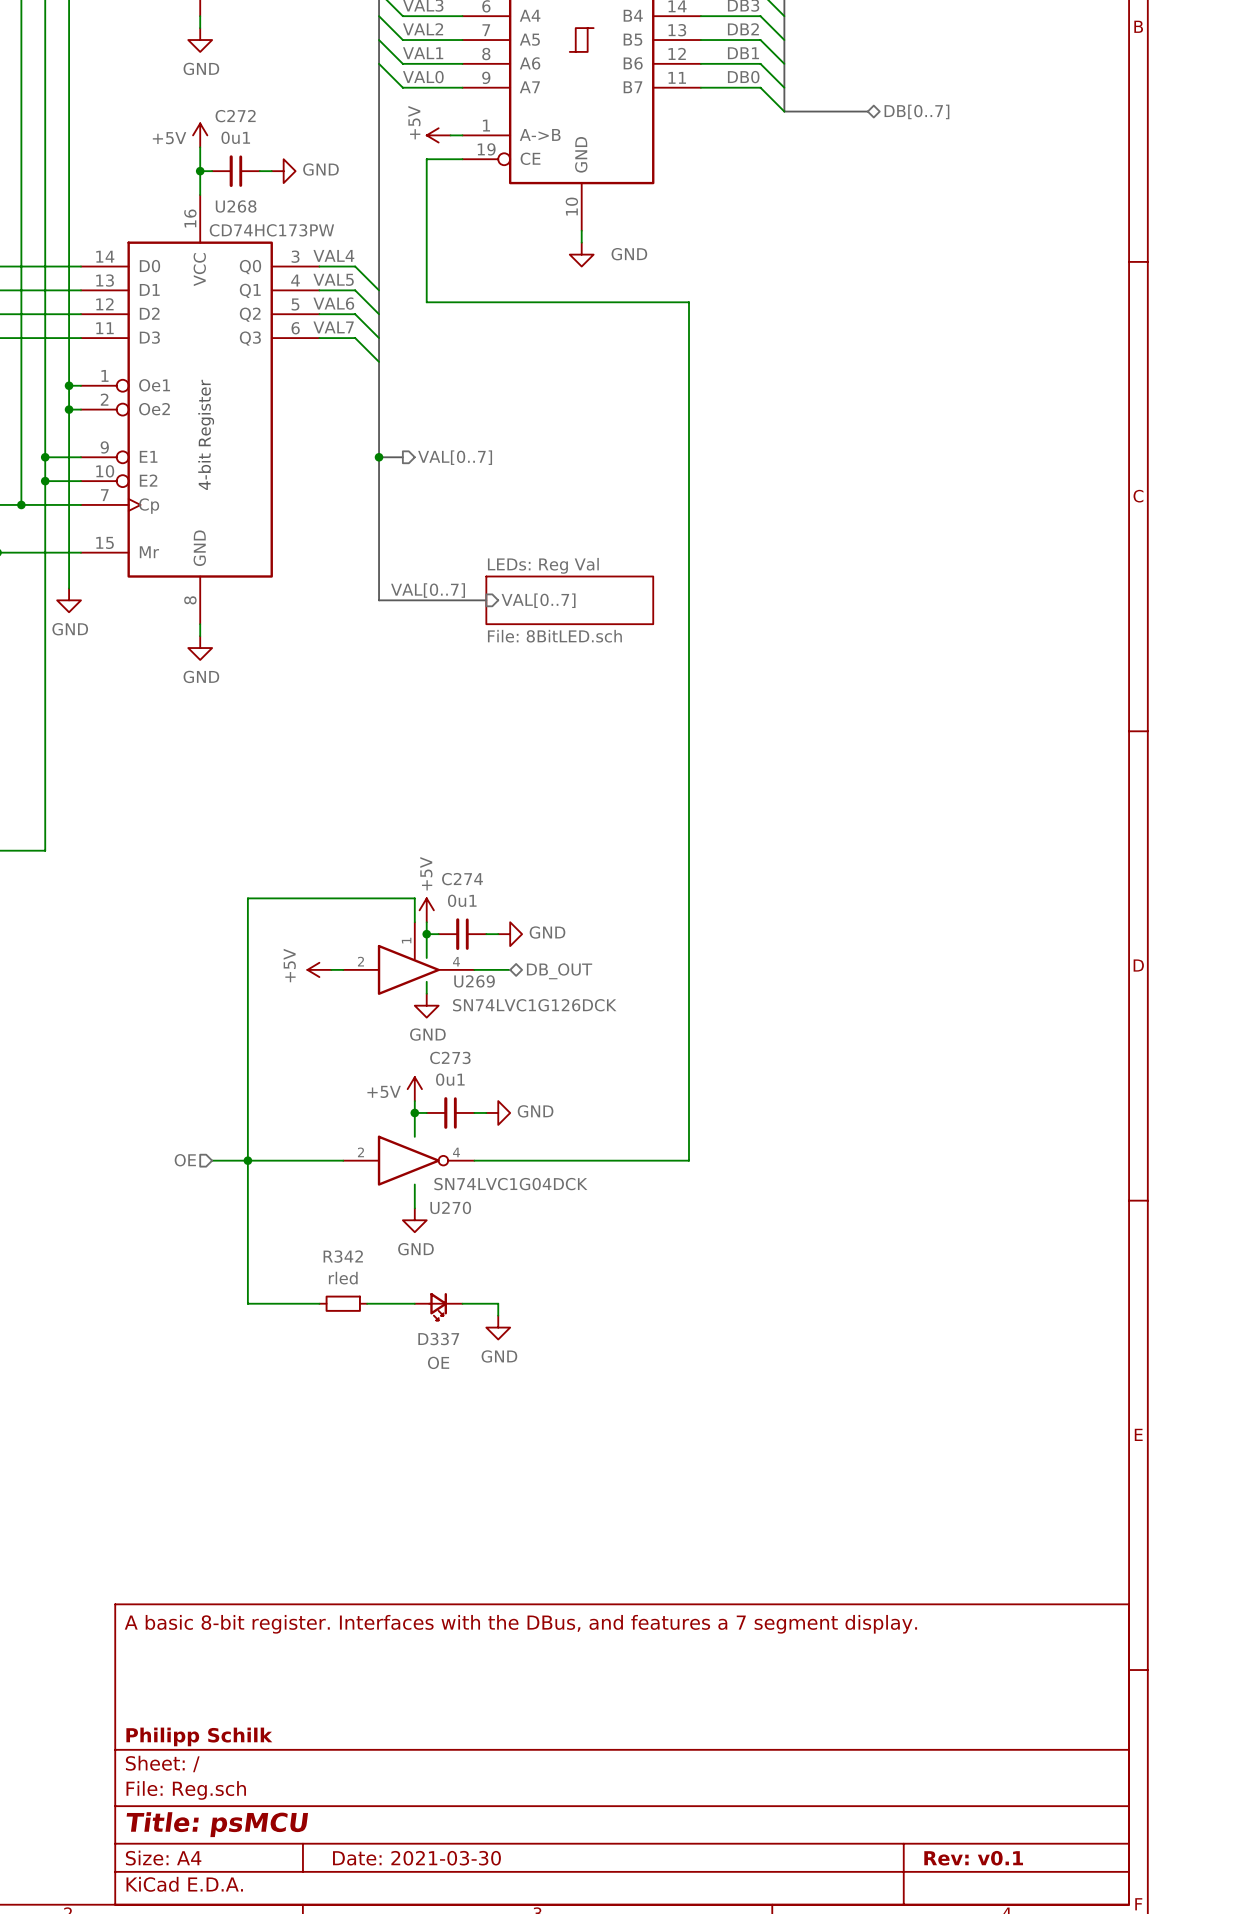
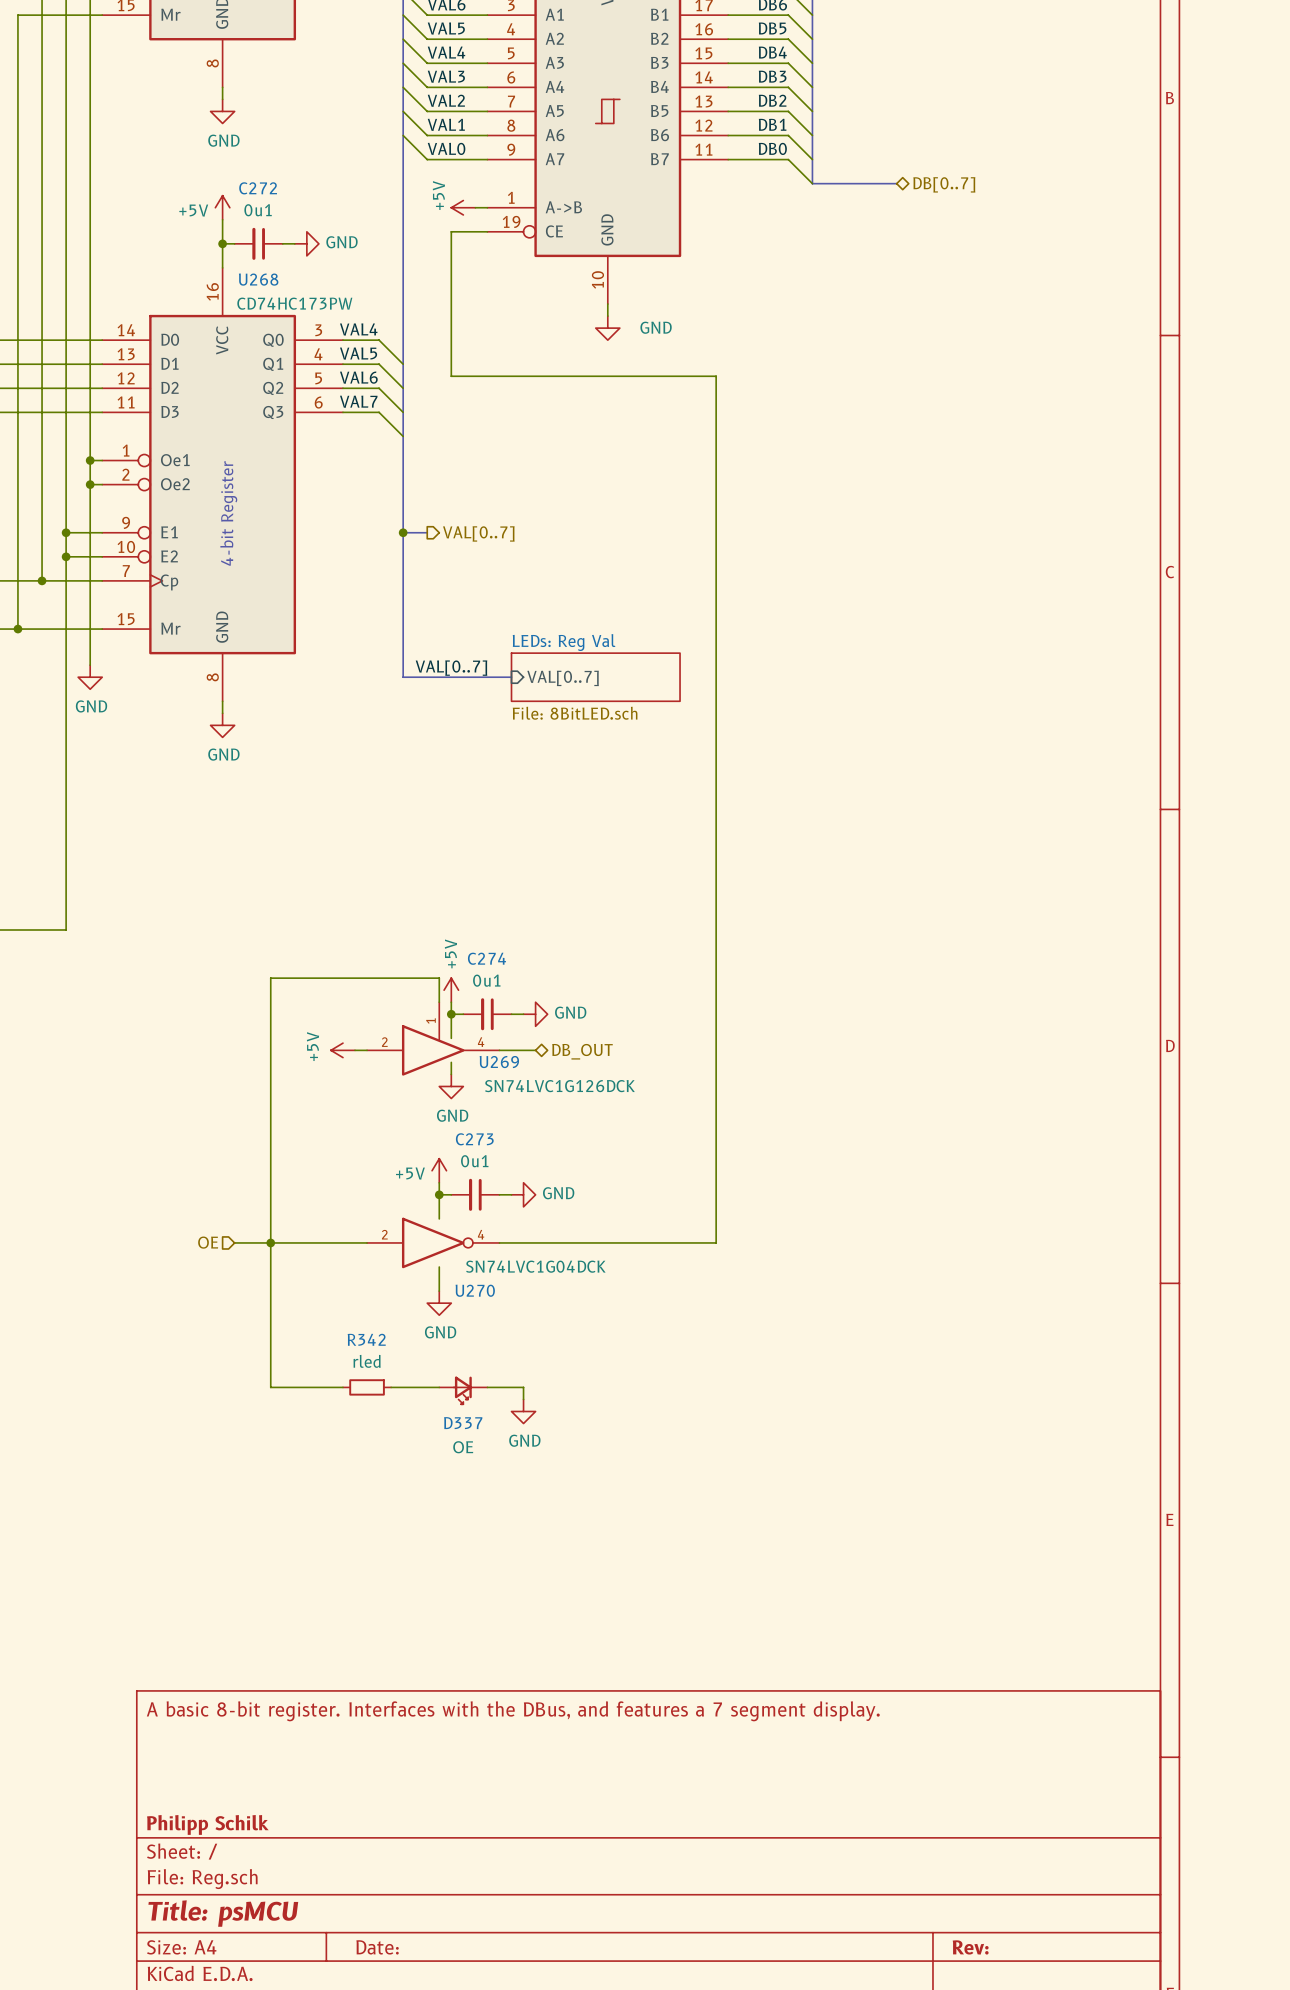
title block: Date: 2021-03-30 (416, 1858) -> Date: (377, 1947)
title block: Rev: v0.1 (973, 1858) -> Rev: (970, 1947)

